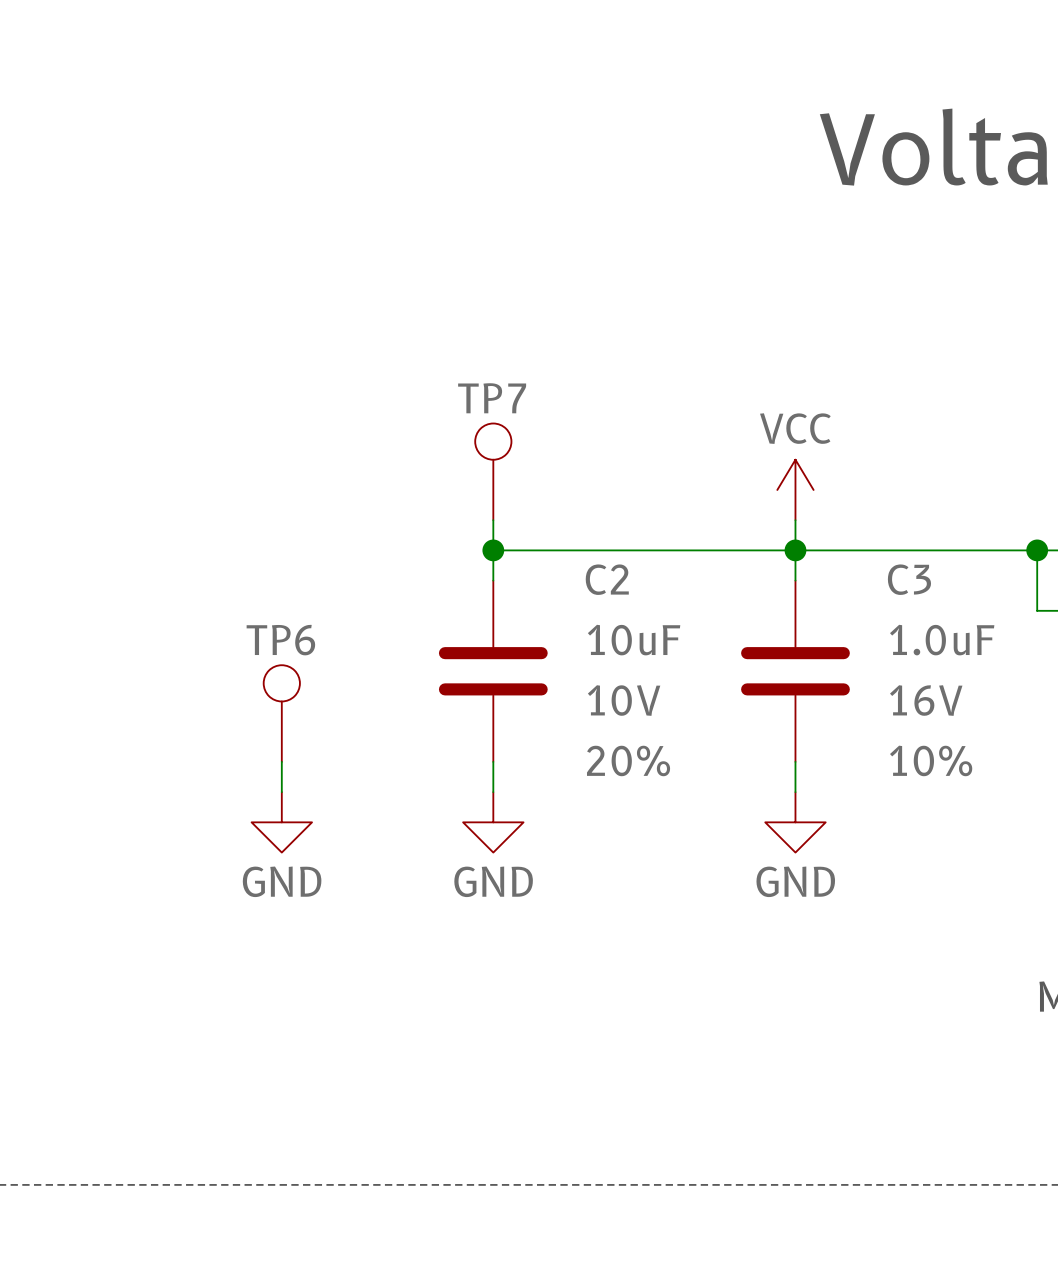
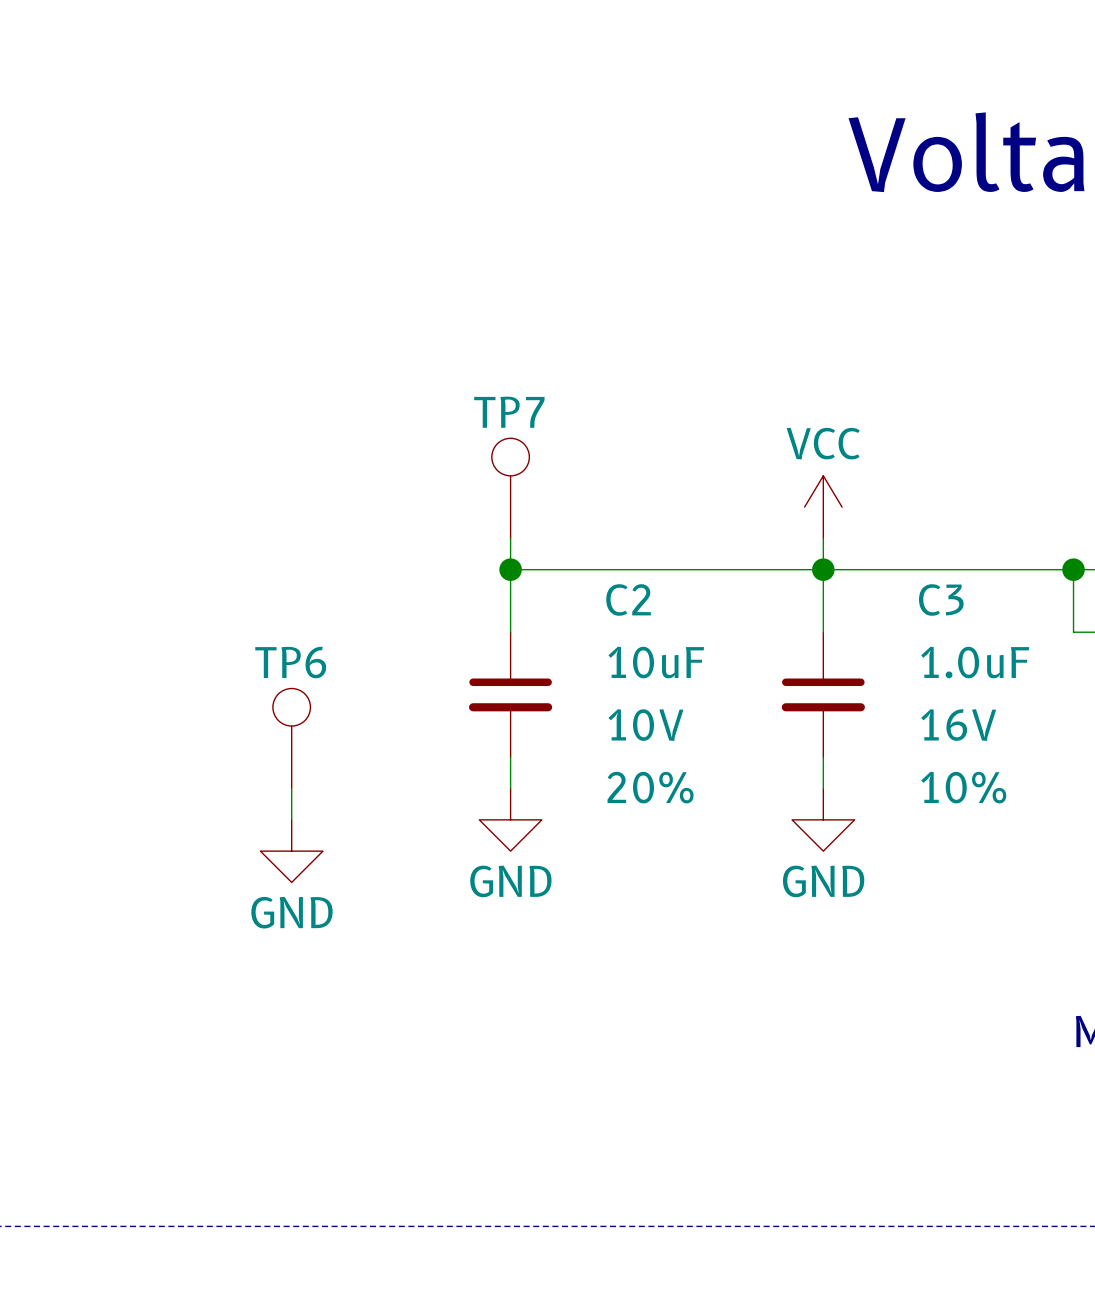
C2 symbol: [438, 580, 548, 762] -> [469, 632, 553, 758]
C3 symbol: [741, 580, 850, 762] -> [781, 632, 865, 758]
power symbol position: GND (493, 822) -> GND (510, 819)
power symbol position: GND (795, 822) -> GND (823, 819)

